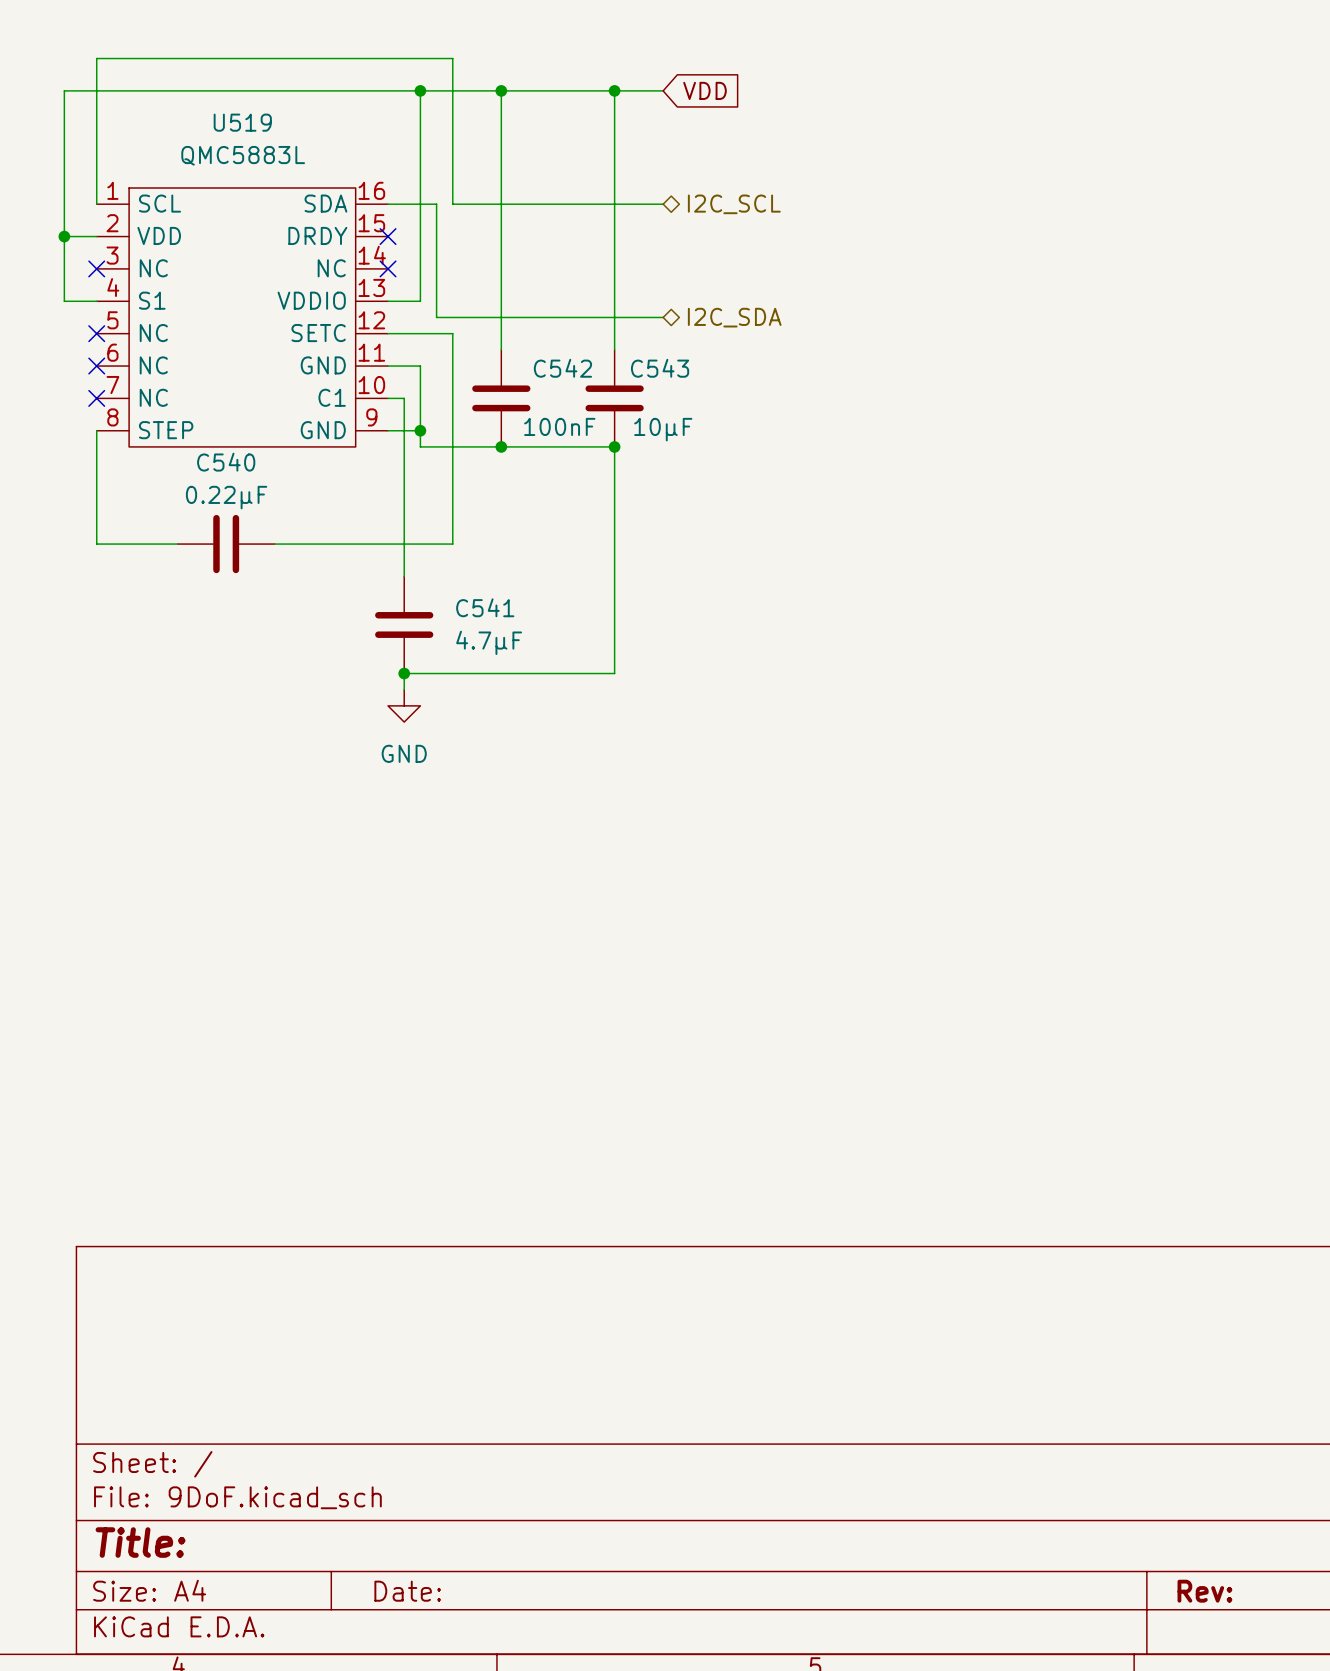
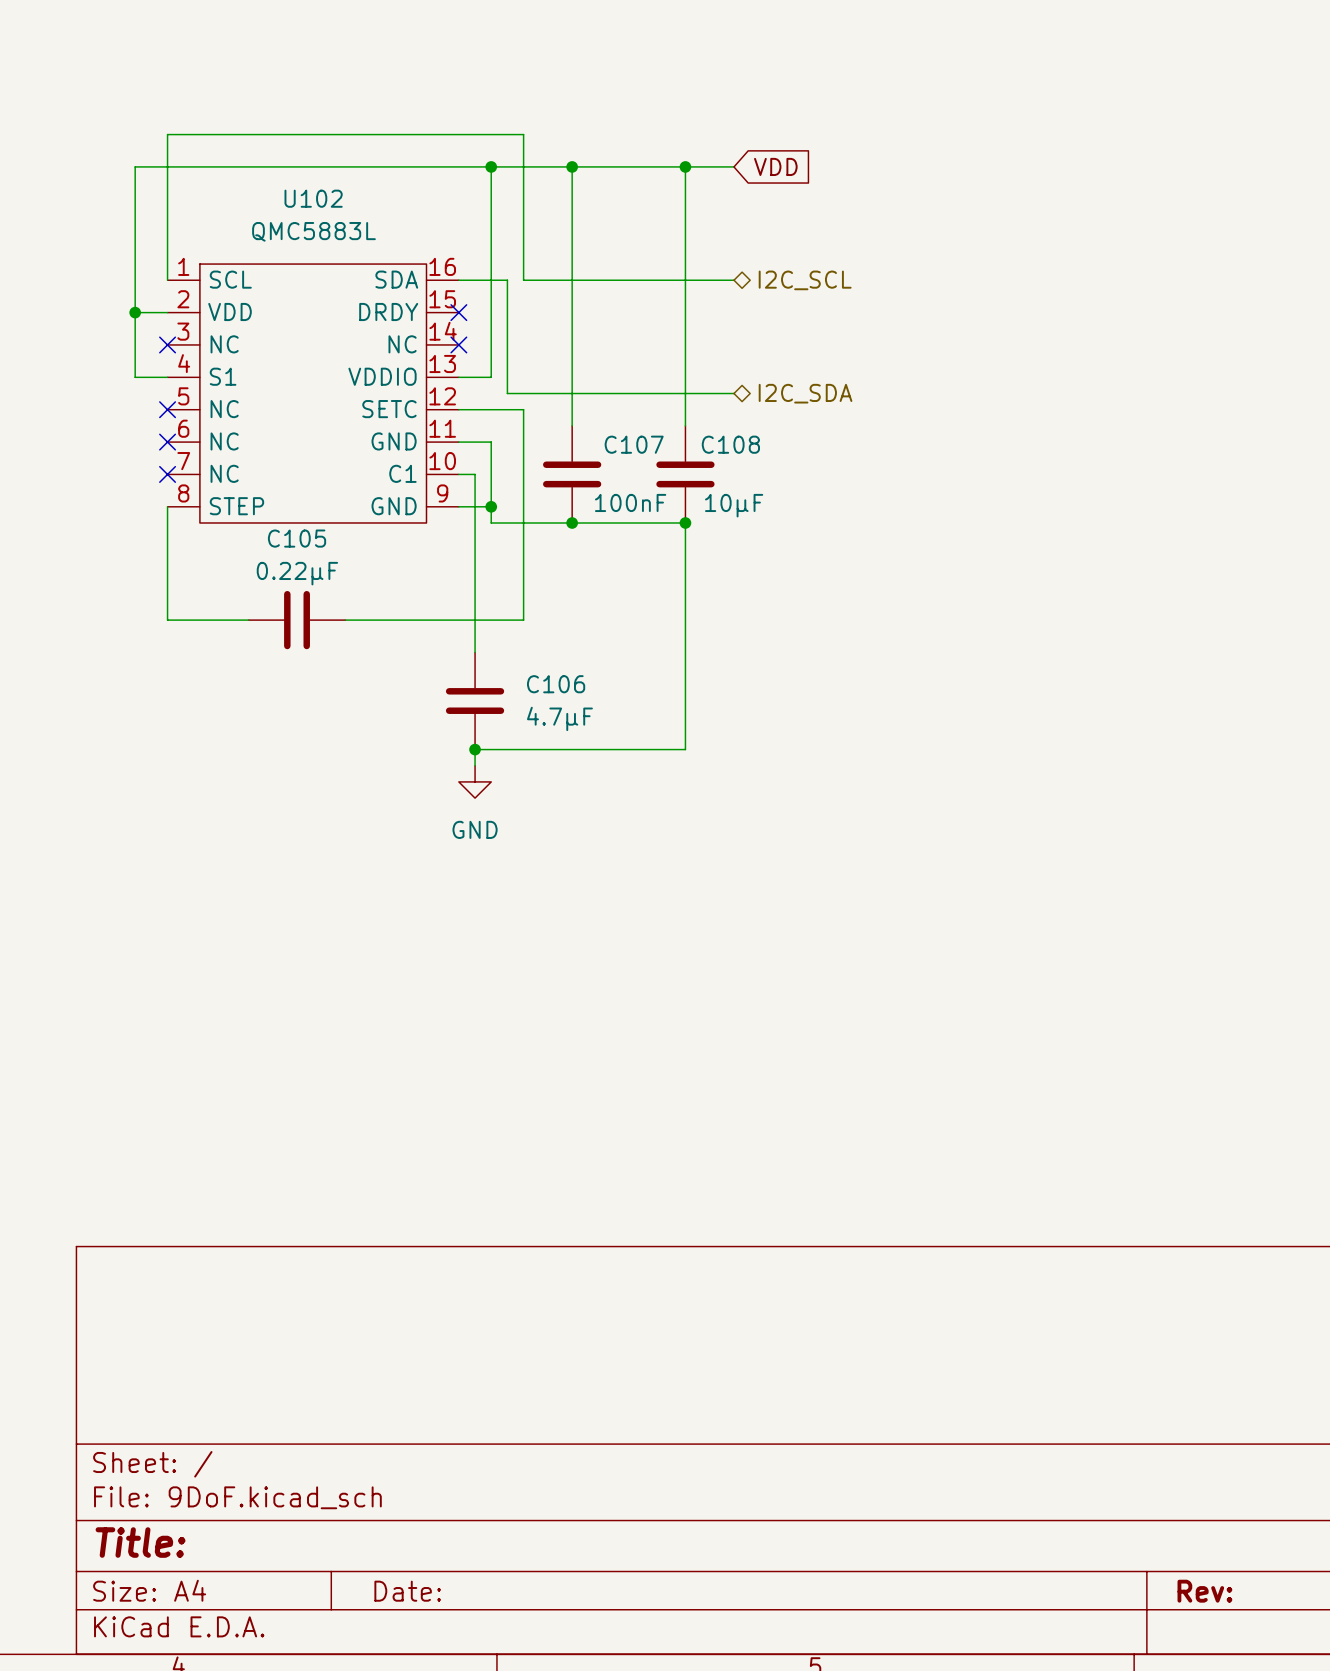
wire: (420, 90) (420, 301) (388, 301) -> (491, 166) (491, 377) (458, 377)
junction: (420, 90) -> none
wire: (501, 90) (501, 349) -> (572, 166) (572, 425)
junction: (501, 90) -> none
wire: (614, 90) (614, 349) -> (685, 166) (685, 425)
junction: (614, 90) -> none
wire: (663, 90) (64, 90) (64, 301) (96, 301) -> (733, 166) (135, 166) (135, 377) (167, 377)
global label position: VDD (705, 90) -> VDD (775, 166)
junction: none -> (491, 166)
junction: none -> (572, 166)
junction: none -> (685, 166)
wire: (96, 204) (96, 58) (452, 58) (452, 204) (663, 204) -> (167, 280) (167, 134) (523, 134) (523, 280) (733, 280)
wire: (388, 204) (436, 204) (436, 317) (663, 317) -> (458, 280) (507, 280) (507, 393) (733, 393)
hierarchical label position: I2C_SCL (734, 204) -> I2C_SCL (805, 280)
wire: (64, 236) (96, 236) -> (135, 312) (167, 312)
junction: (64, 236) -> none
no-connect mark: (388, 236) -> none
no-connect mark: (96, 268) -> none
no-connect mark: (388, 268) -> none
junction: none -> (135, 312)
no-connect mark: none -> (458, 312)
U519: QMC5883L (242, 317) -> none
hierarchical label position: I2C_SDA (734, 317) -> I2C_SDA (805, 393)
no-connect mark: (96, 333) -> none
wire: (388, 333) (452, 333) (452, 544) (274, 544) -> (458, 409) (523, 409) (523, 620) (345, 620)
no-connect mark: none -> (167, 344)
no-connect mark: none -> (458, 344)
no-connect mark: (96, 366) -> none
wire: (388, 366) (420, 366) (420, 446) (614, 446) (614, 673) (404, 673) (404, 689) -> (458, 442) (491, 442) (491, 522) (685, 522) (685, 749) (475, 749) (475, 765)
U102: none -> QMC5883L (313, 393)
no-connect mark: (96, 398) -> none
wire: (388, 398) (404, 398) (404, 576) -> (458, 474) (475, 474) (475, 652)
C542: 100nF (501, 398) -> none
C543: 10μF (614, 398) -> none
no-connect mark: none -> (167, 409)
wire: (96, 430) (96, 544) (177, 544) -> (167, 506) (167, 620) (248, 620)
wire: (388, 430) (420, 430) -> (458, 506) (491, 506)
junction: (420, 430) -> none
no-connect mark: none -> (167, 442)
junction: (501, 446) -> none
junction: (614, 446) -> none
no-connect mark: none -> (167, 474)
C107: none -> 100nF (572, 474)
C108: none -> 10μF (685, 474)
junction: none -> (491, 506)
junction: none -> (572, 522)
junction: none -> (685, 522)
C540: 0.22μF (226, 544) -> none
C105: none -> 0.22μF (297, 620)
C541: 4.7μF (404, 624) -> none
junction: (404, 673) -> none
C106: none -> 4.7μF (475, 701)
power symbol position: GND (404, 705) -> GND (475, 781)
junction: none -> (475, 749)

